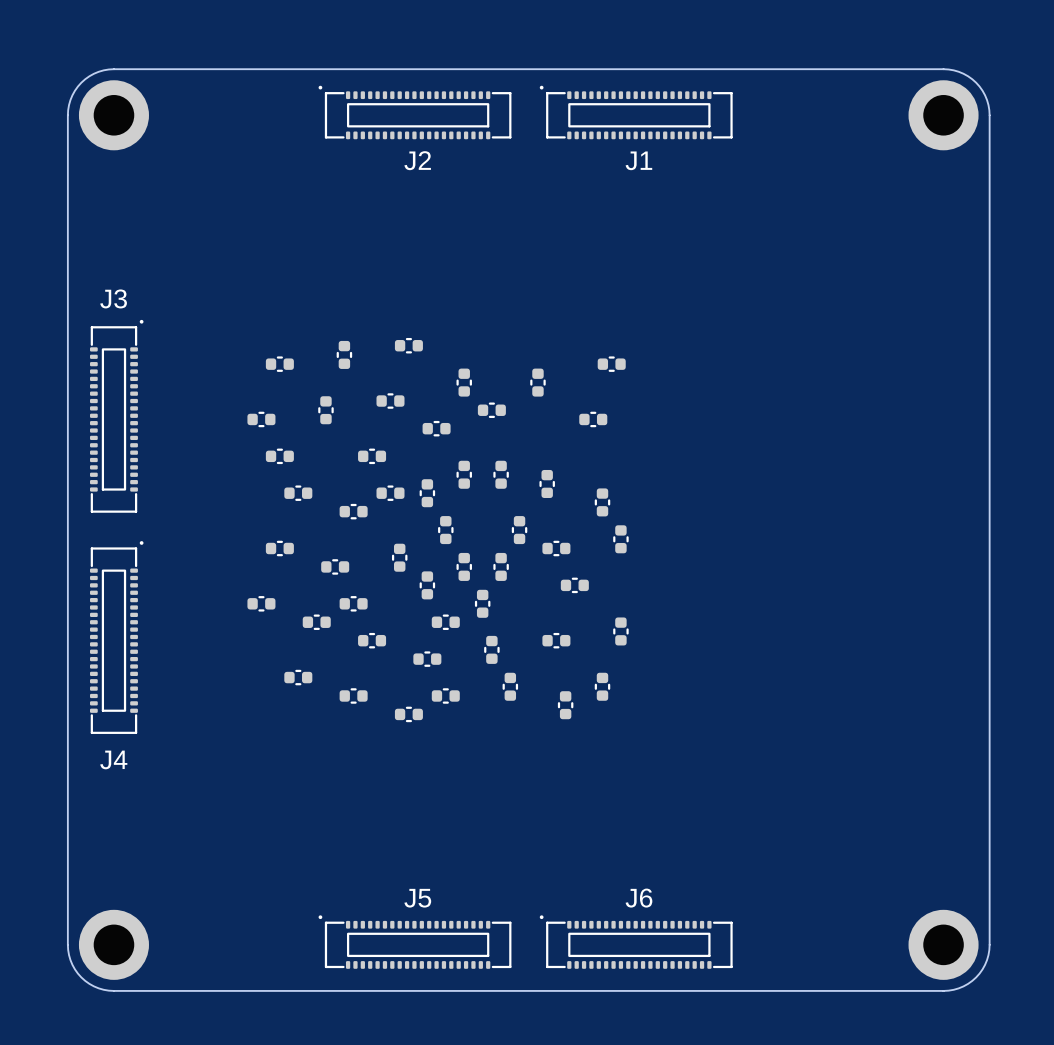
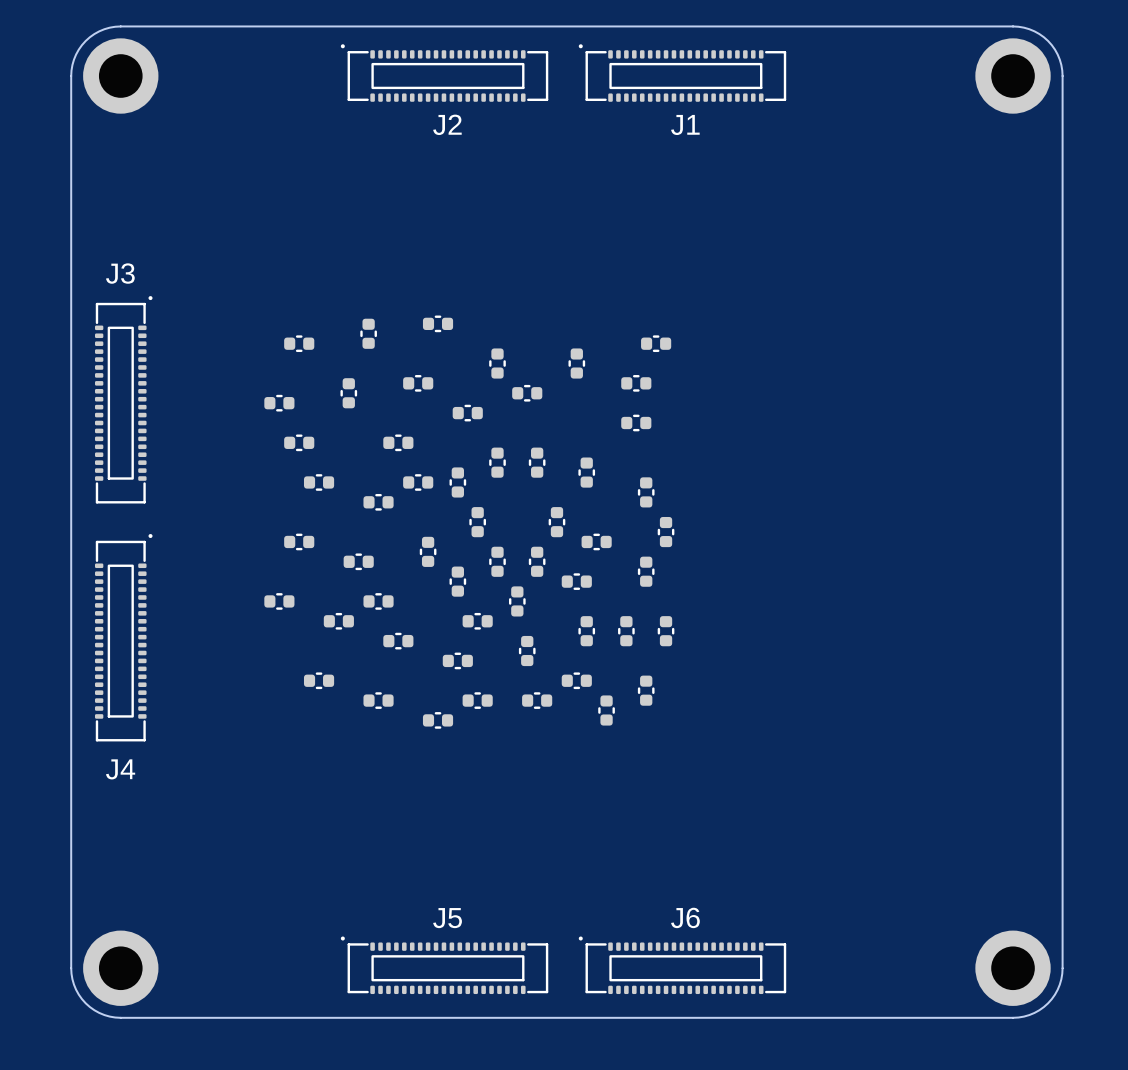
part: none -> (636, 383)
part: (593, 419) -> none
part: none -> (636, 422)
part: none -> (646, 571)
part: none -> (576, 581)
part: (574, 585) -> none
part: none -> (626, 631)
part rotation: 0° (556, 640) -> 90° clockwise (586, 631)
part: none -> (576, 680)
part rotation: 0° (510, 686) -> 90° clockwise (537, 700)

